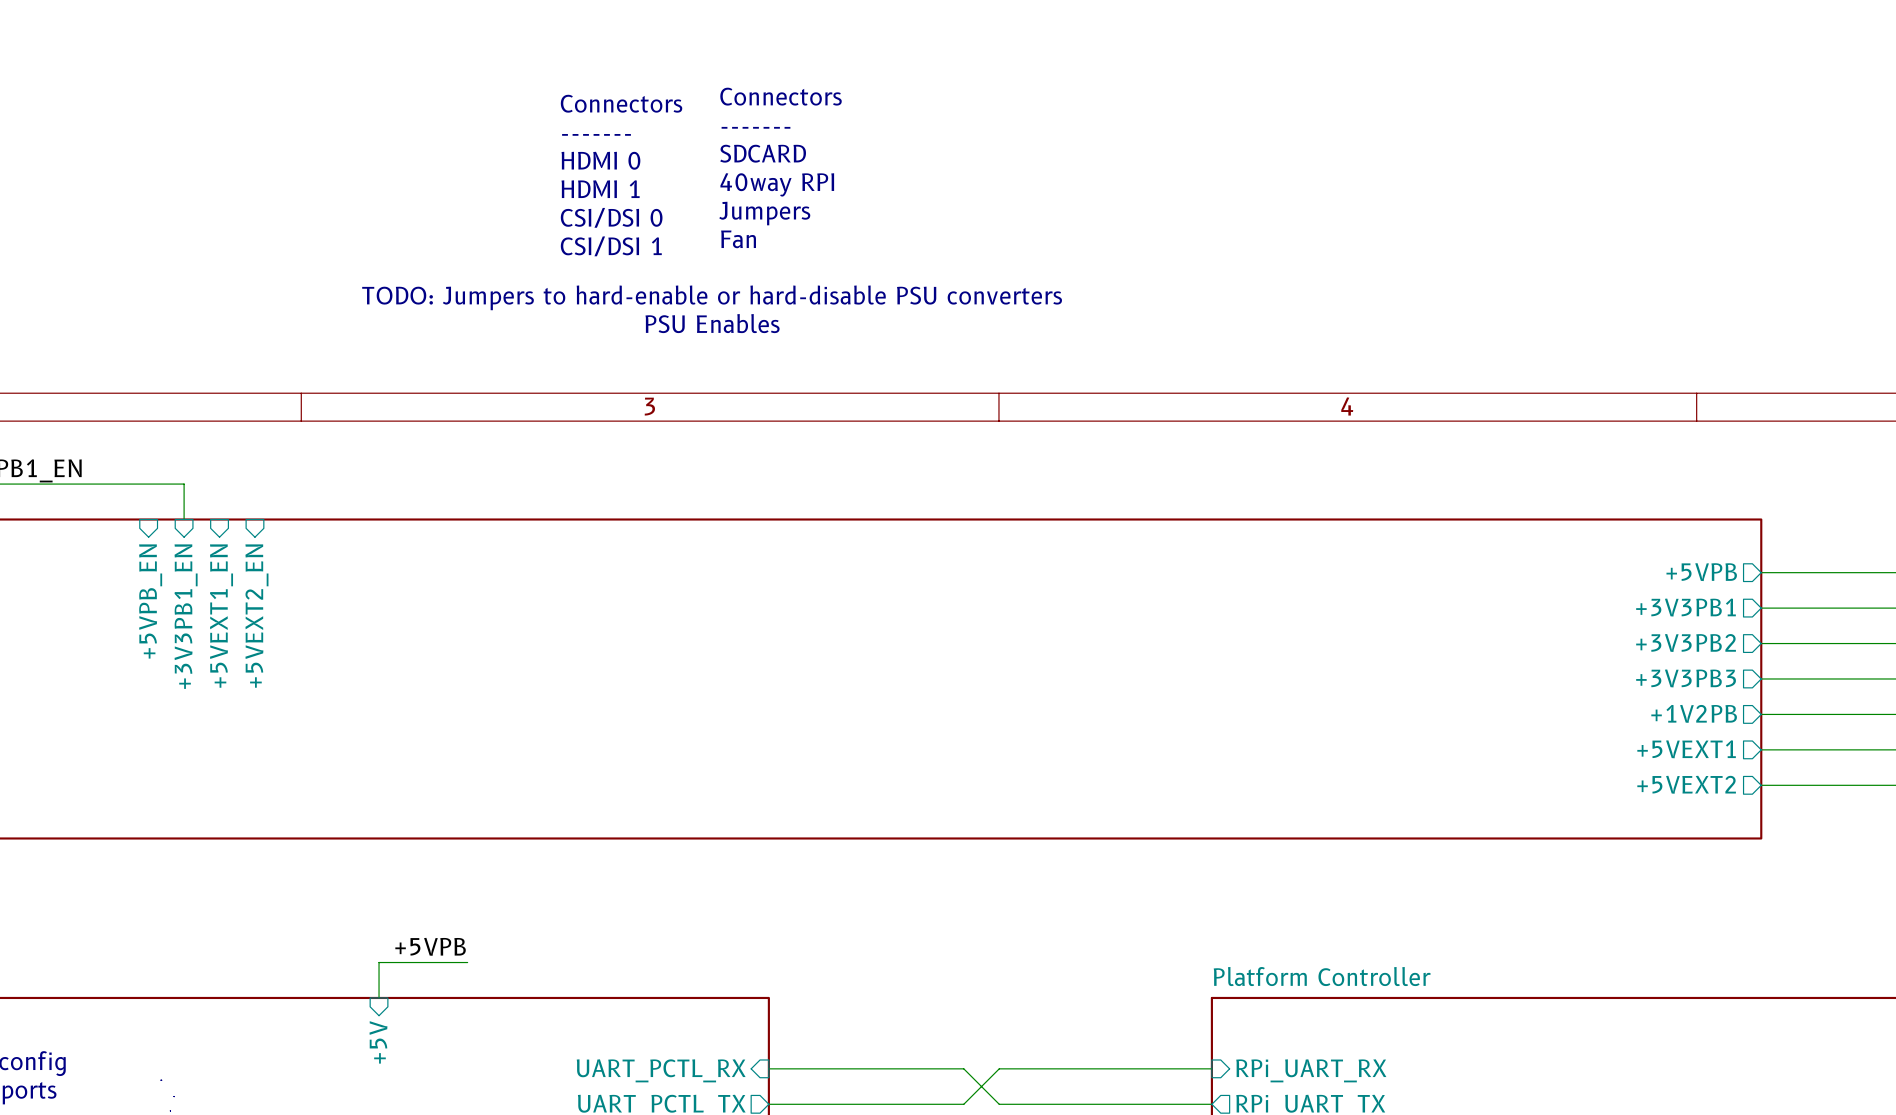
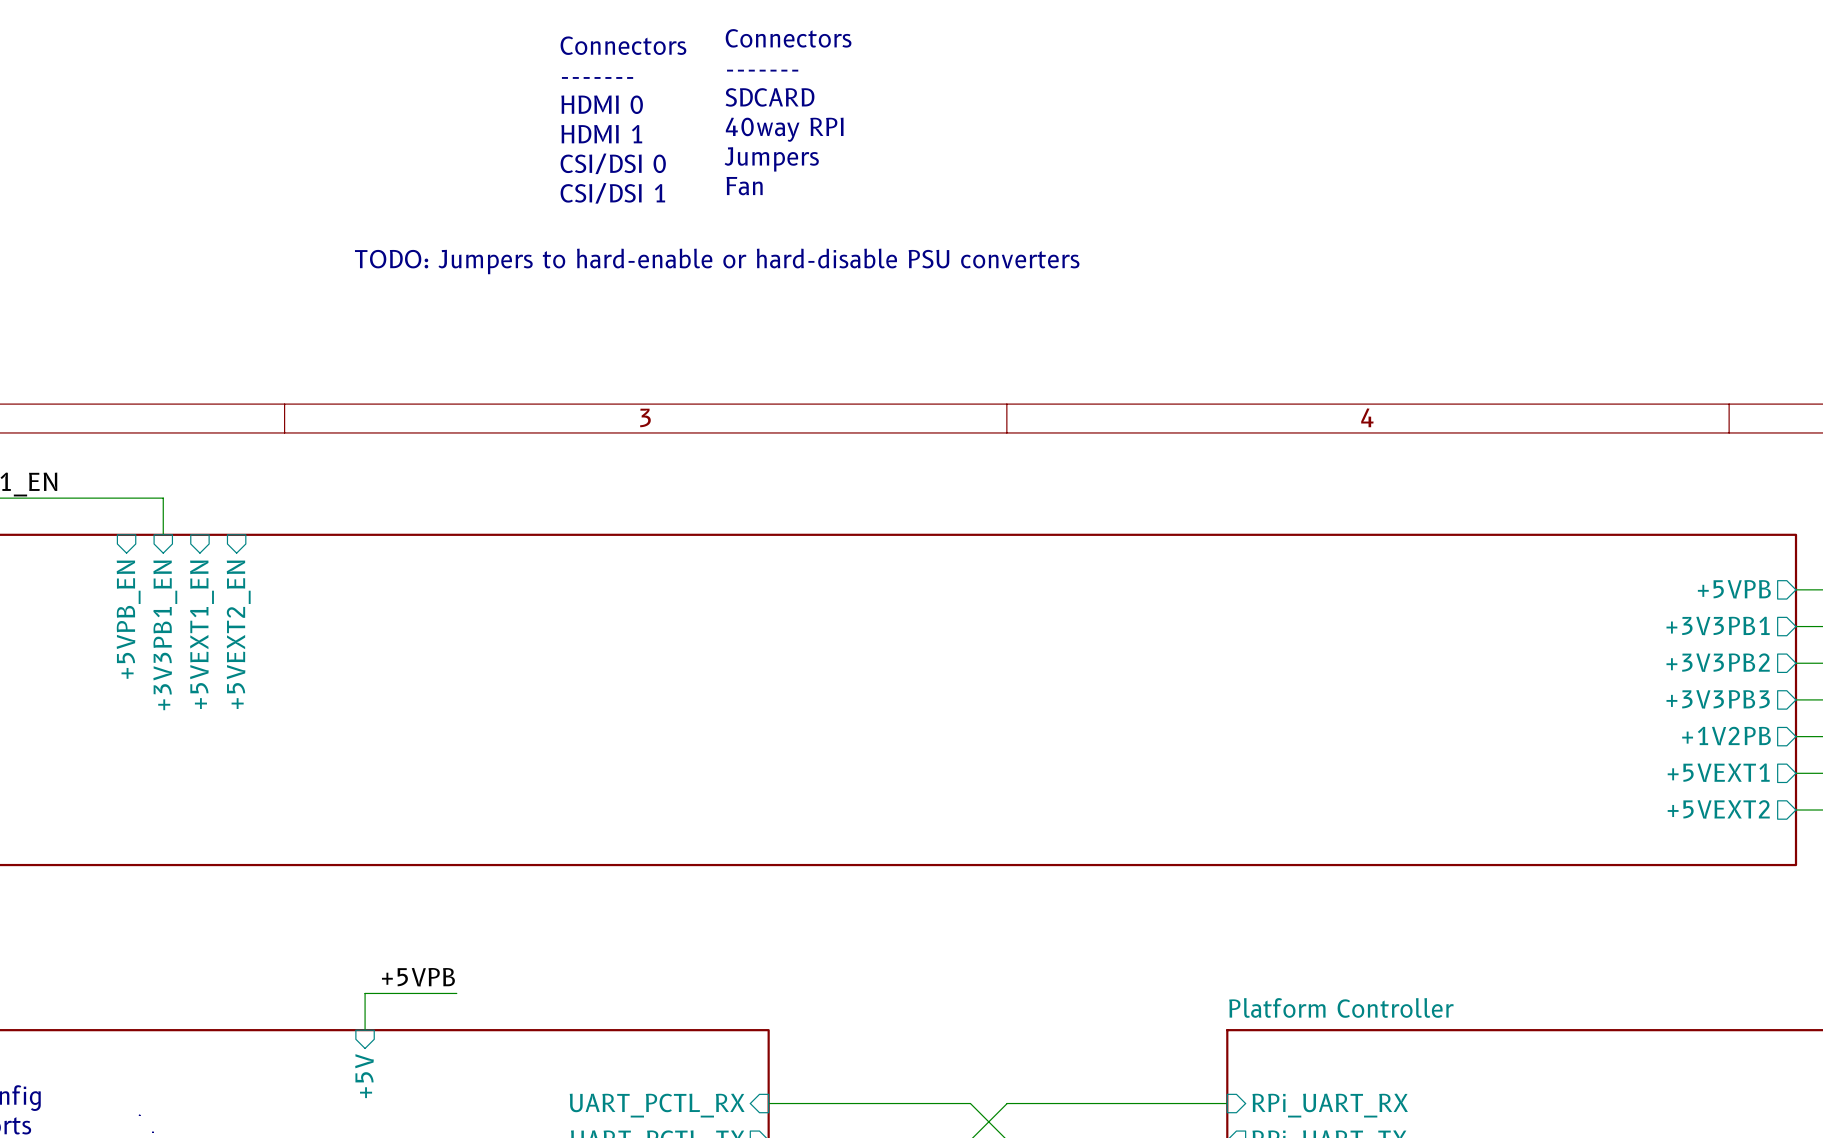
text position: Connectors (781, 96) -> Connectors (788, 38)
text position: Connectors (621, 103) -> Connectors (623, 45)
text position: ------- (755, 127) -> ------- (762, 70)
text position: ------- (596, 134) -> ------- (597, 77)
text position: SDCARD (763, 153) -> SDCARD (770, 97)
text position: HDMI 0 (600, 160) -> HDMI 0 (602, 104)
text position: 40way RPI (777, 184) -> 40way RPI (784, 129)
text position: HDMI 1 (600, 189) -> HDMI 1 (601, 134)
text position: Jumpers (764, 213) -> Jumpers (771, 159)
text position: CSI/DSI 0 (611, 217) -> CSI/DSI 0 (613, 163)
text position: Fan (738, 239) -> Fan (744, 186)
text position: CSI/DSI 1 (611, 246) -> CSI/DSI 1 (612, 193)
text position: TODO: Jumpers to hard-enable or hard-disable PSU converters (712, 297) -> TODO: Jumpers to hard-enable or hard-disable PSU converters (717, 261)
text: PSU Enables (712, 323) -> none

